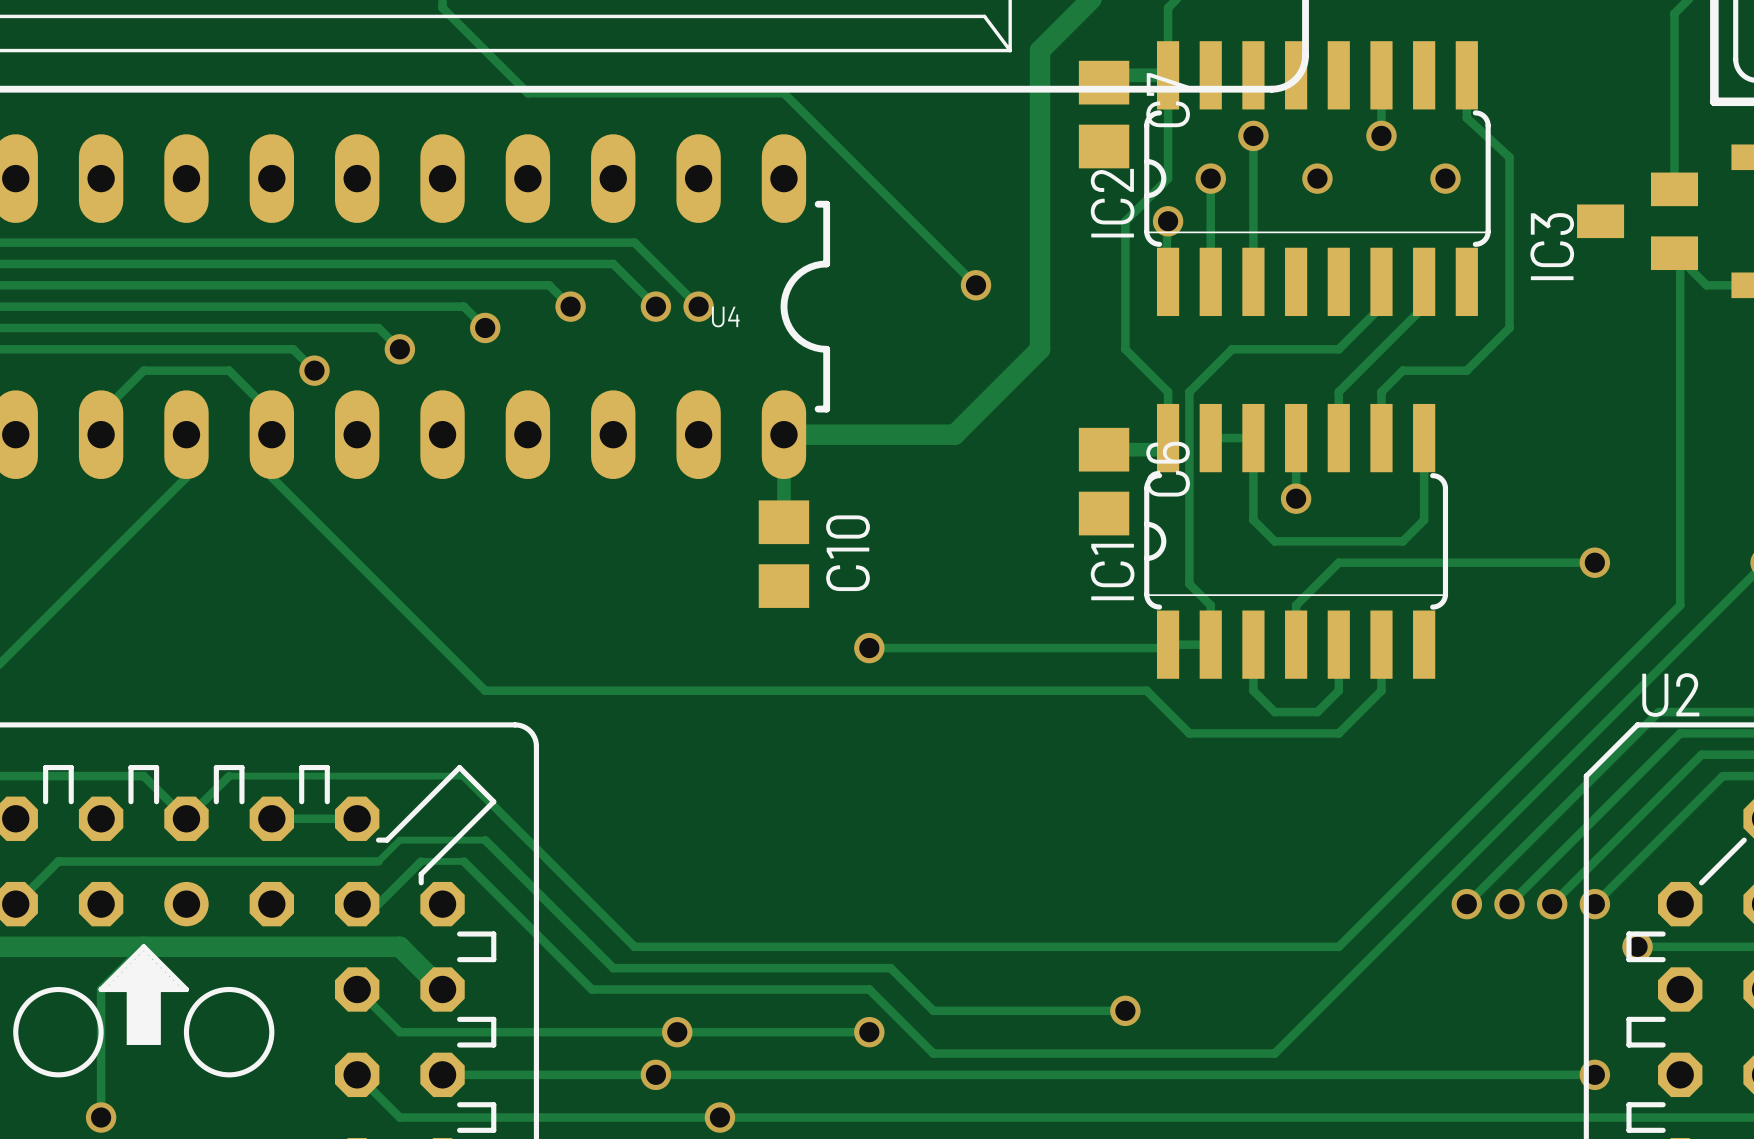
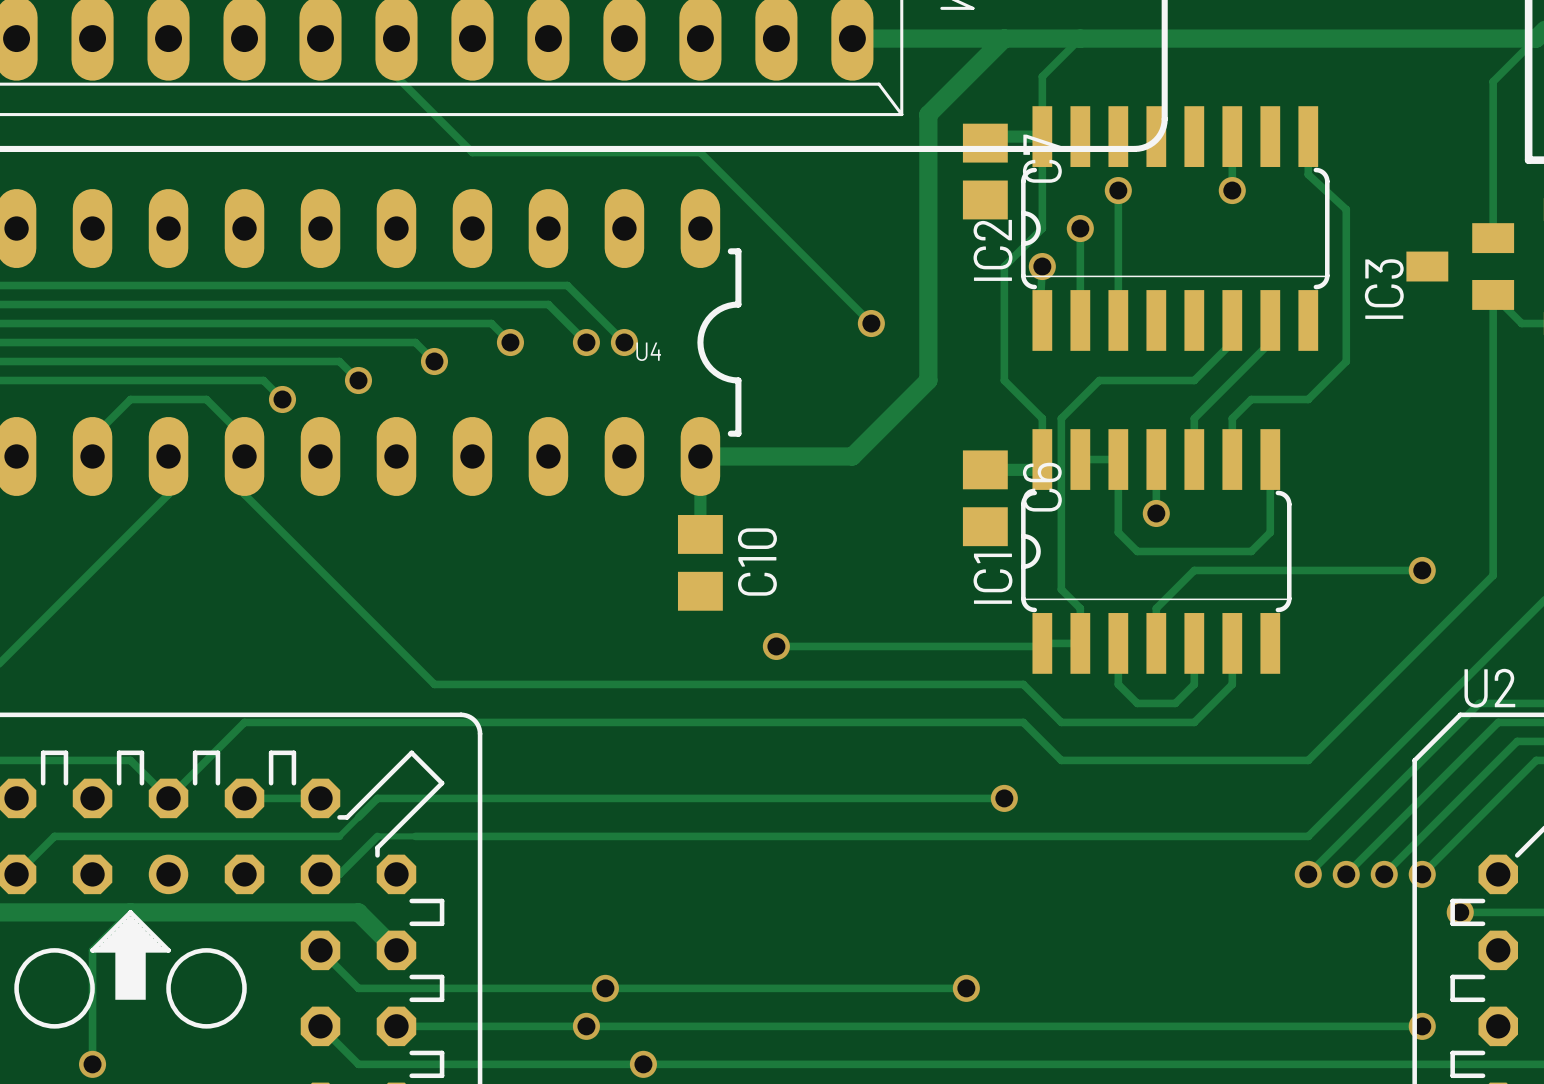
via: (1317, 178) -> none
via: (1445, 178) -> none
track: (1674, 253) (1680, 258) (1680, 605) (1338, 946) (634, 946) (463, 776) (229, 776) -> (1493, 294) (1493, 575) (1308, 760) (1061, 760) (1023, 722) (244, 722) (206, 760)
via: none -> (1004, 798)
track: (399, 840) (485, 840) (613, 968) (890, 968) (933, 1010) (1125, 1010) -> (358, 817) (377, 798) (1004, 798)
track: (463, 861) (591, 989) (869, 989) (933, 1053) (1274, 1053) (1466, 861) -> (415, 836) (1308, 836)
via position: (1125, 1010) -> (966, 988)
track: none -> (776, 988) (966, 988)
via: (869, 1032) -> none

